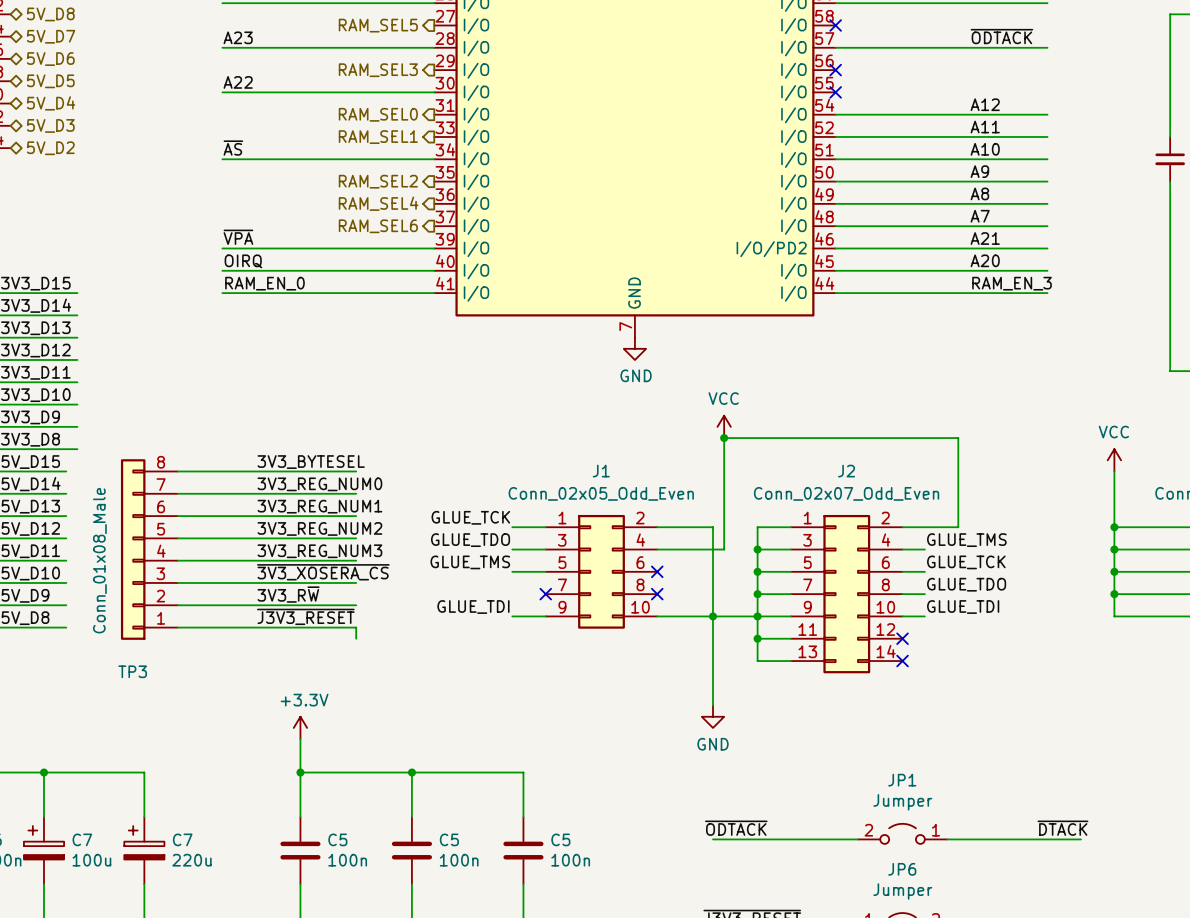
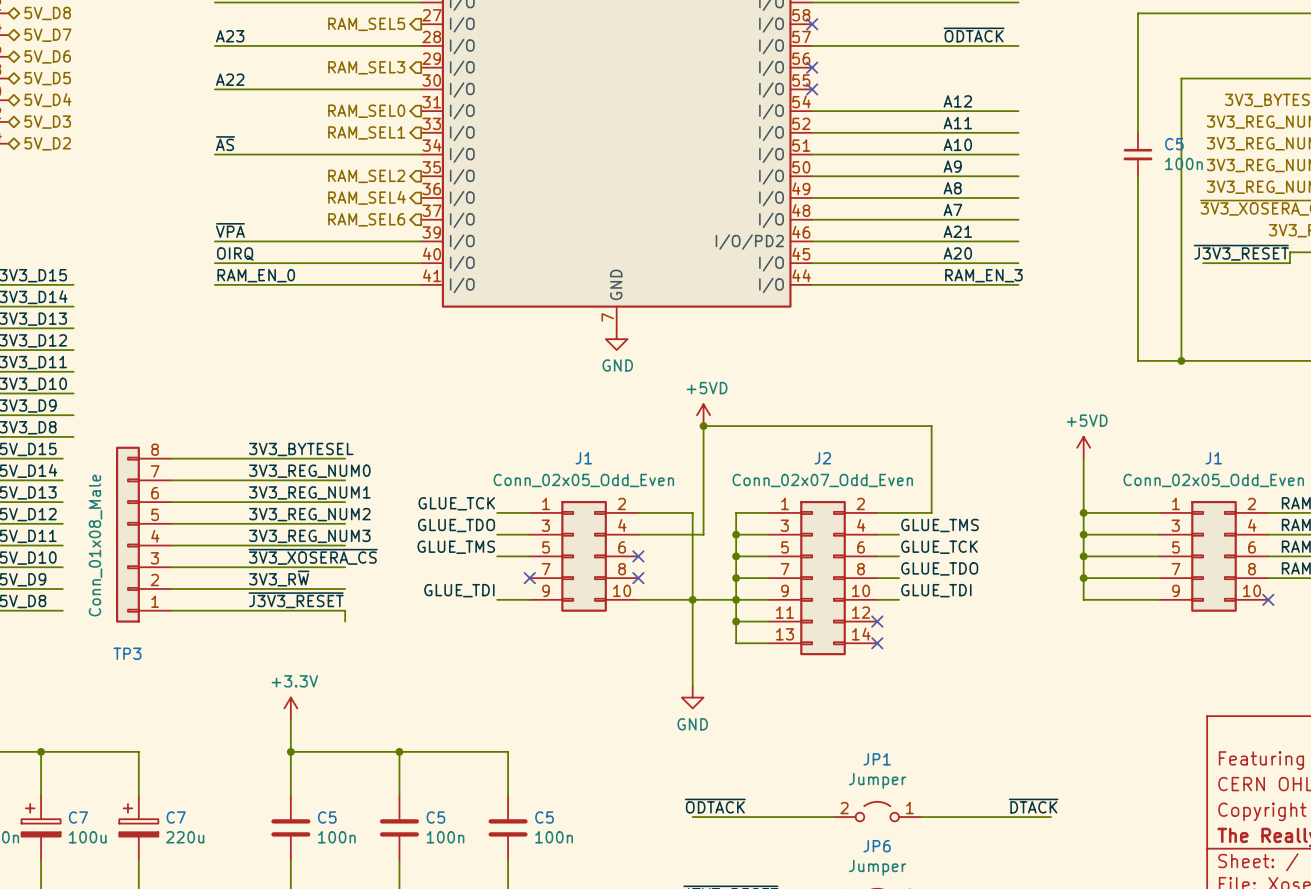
power symbol: VCC (724, 426) -> +5VD (703, 415)
power symbol: VCC (1114, 460) -> +5VD (1083, 447)

